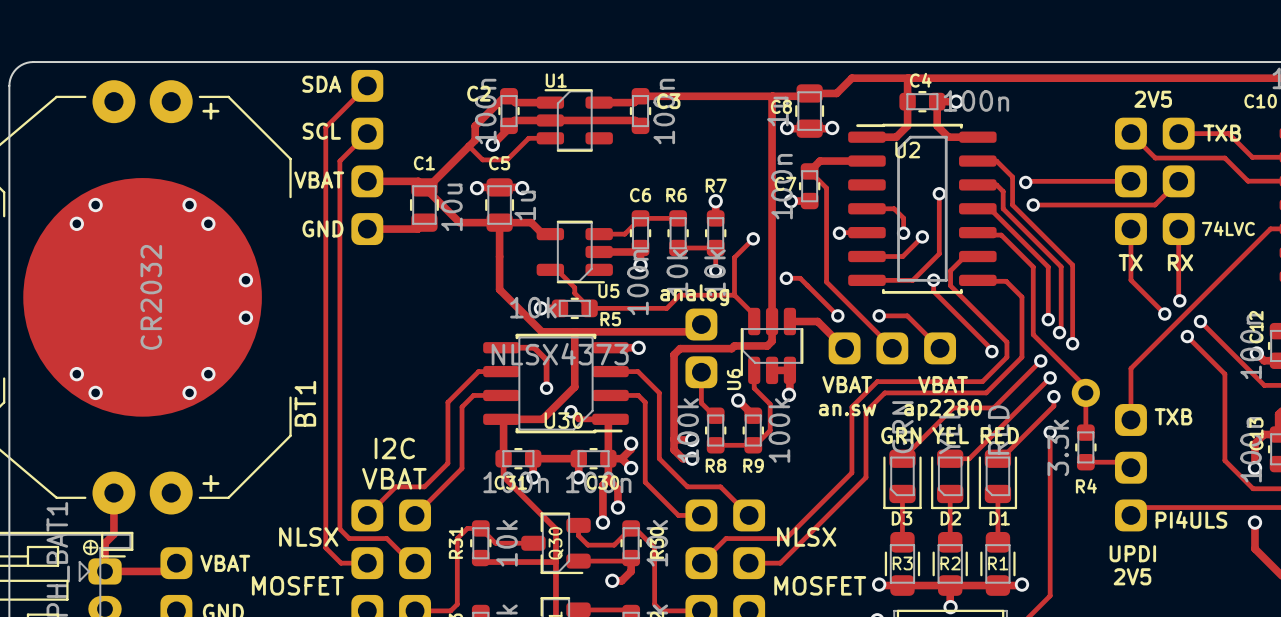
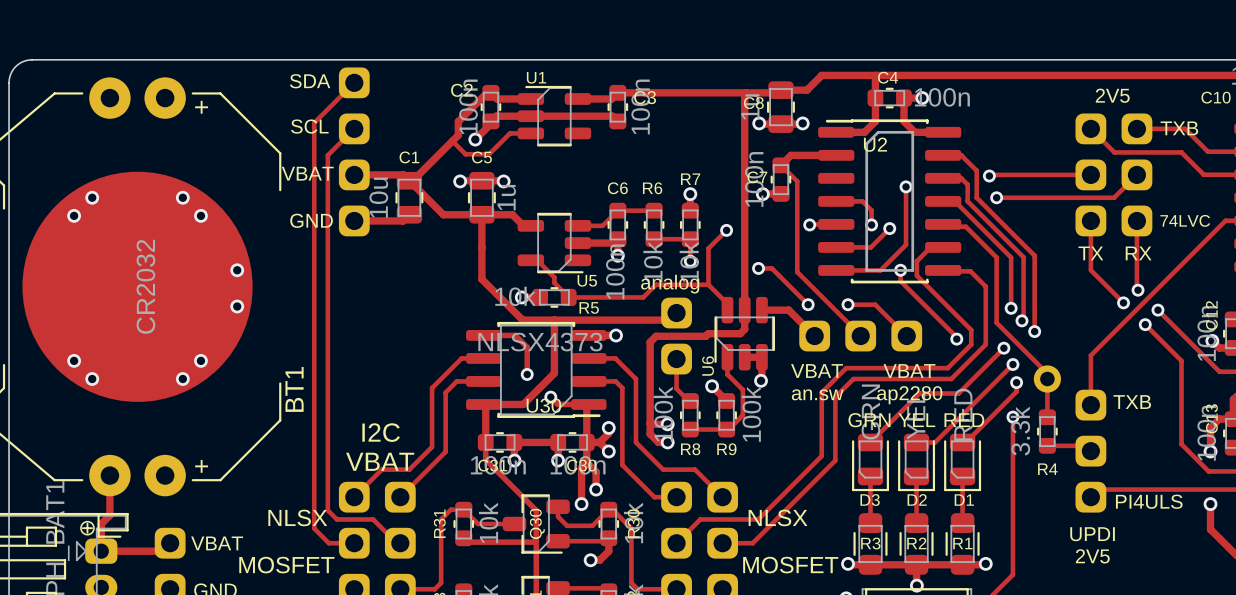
C1 value position: 10u (451, 207) -> 10u (378, 197)

